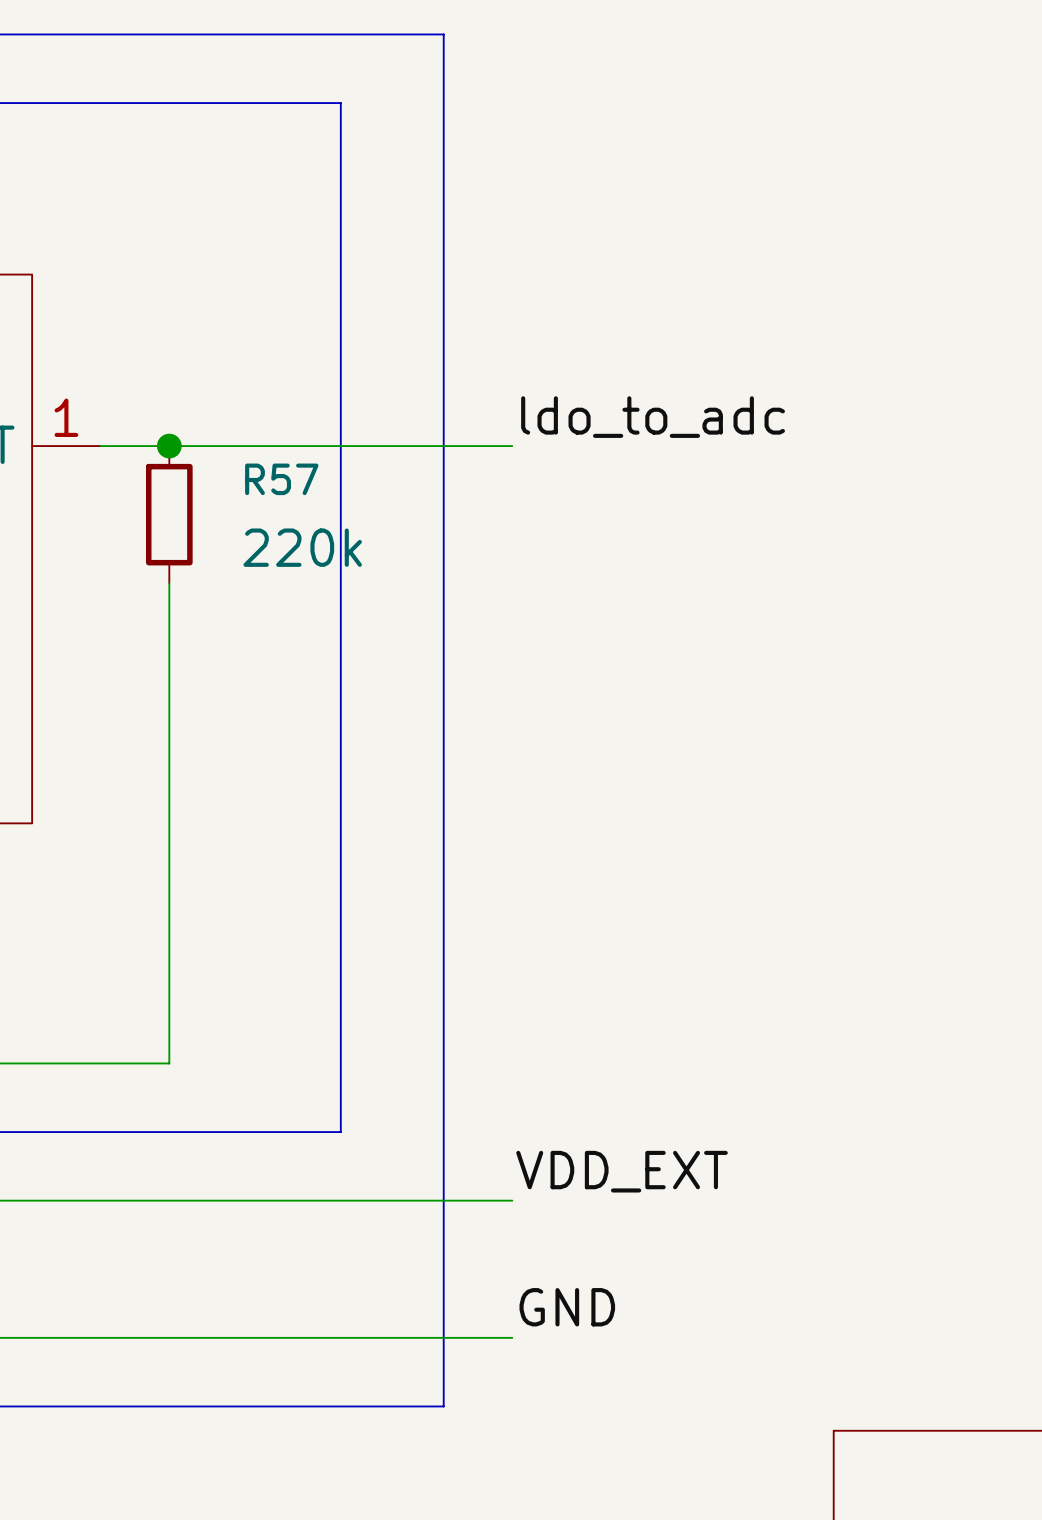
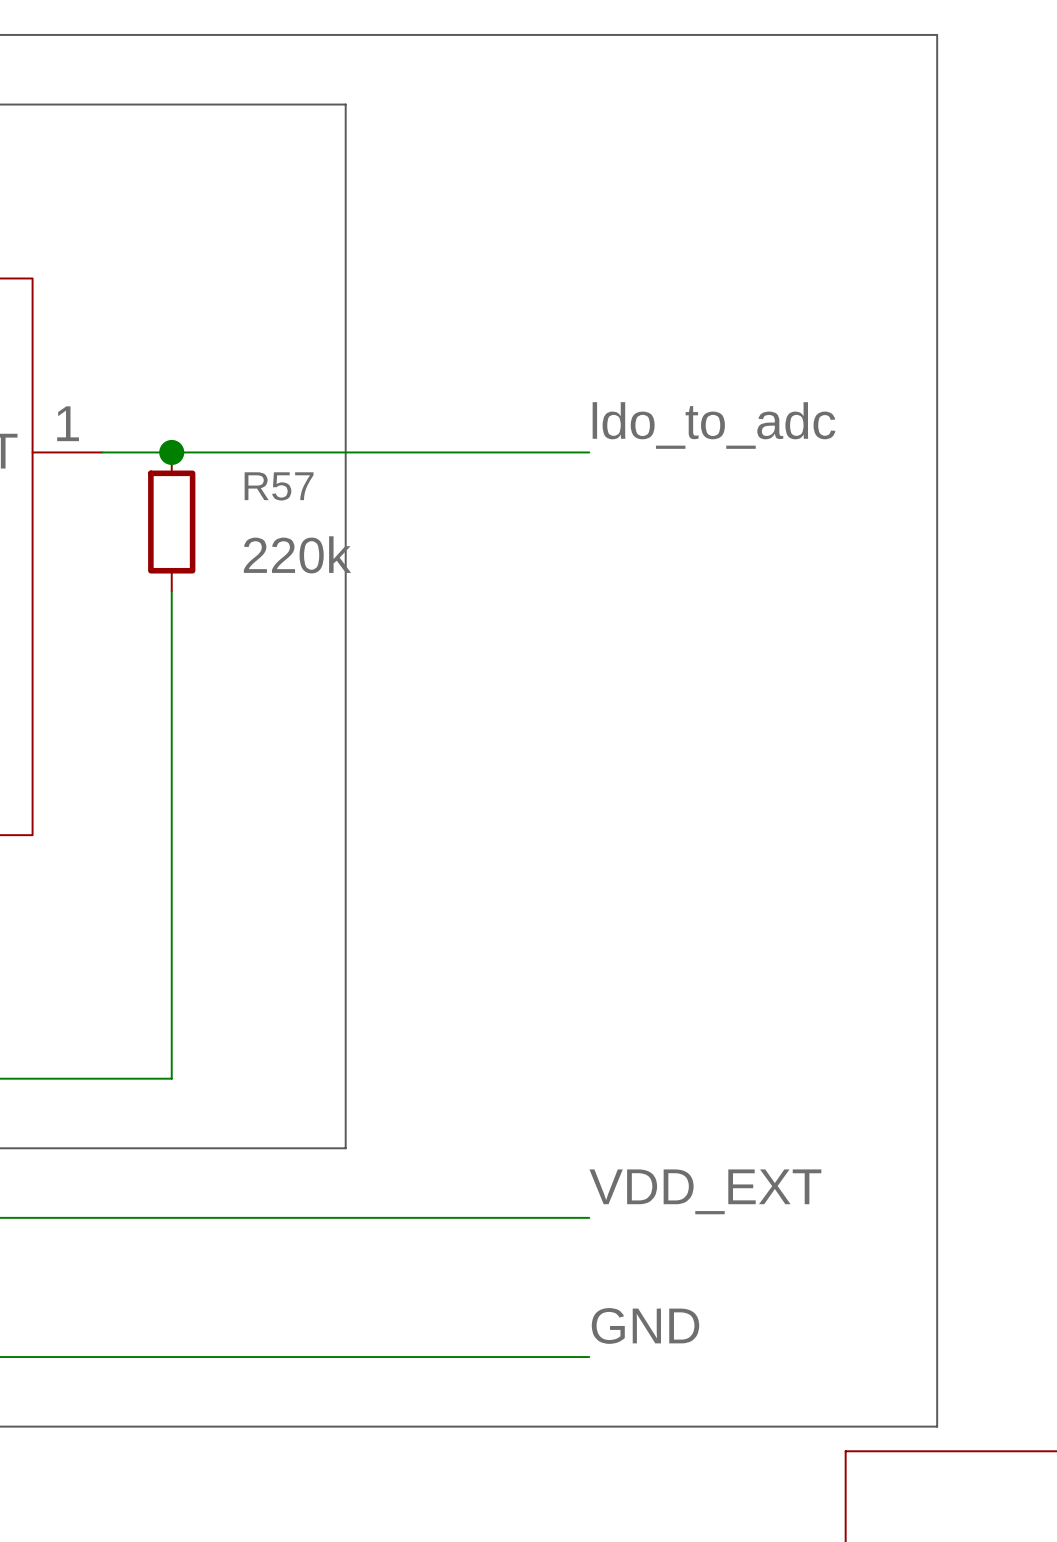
line: (443, 34) (443, 1406) -> (450, 34) (937, 34) (937, 1426) (450, 1426)
label position: ldo_to_adc (653, 417) -> ldo_to_adc (714, 425)
wire: none -> (519, 452) (589, 452)
label position: VDD_EXT (622, 1171) -> VDD_EXT (705, 1191)
wire: none -> (519, 1217) (589, 1217)
label position: GND (567, 1307) -> GND (645, 1325)
wire: none -> (519, 1357) (589, 1357)

